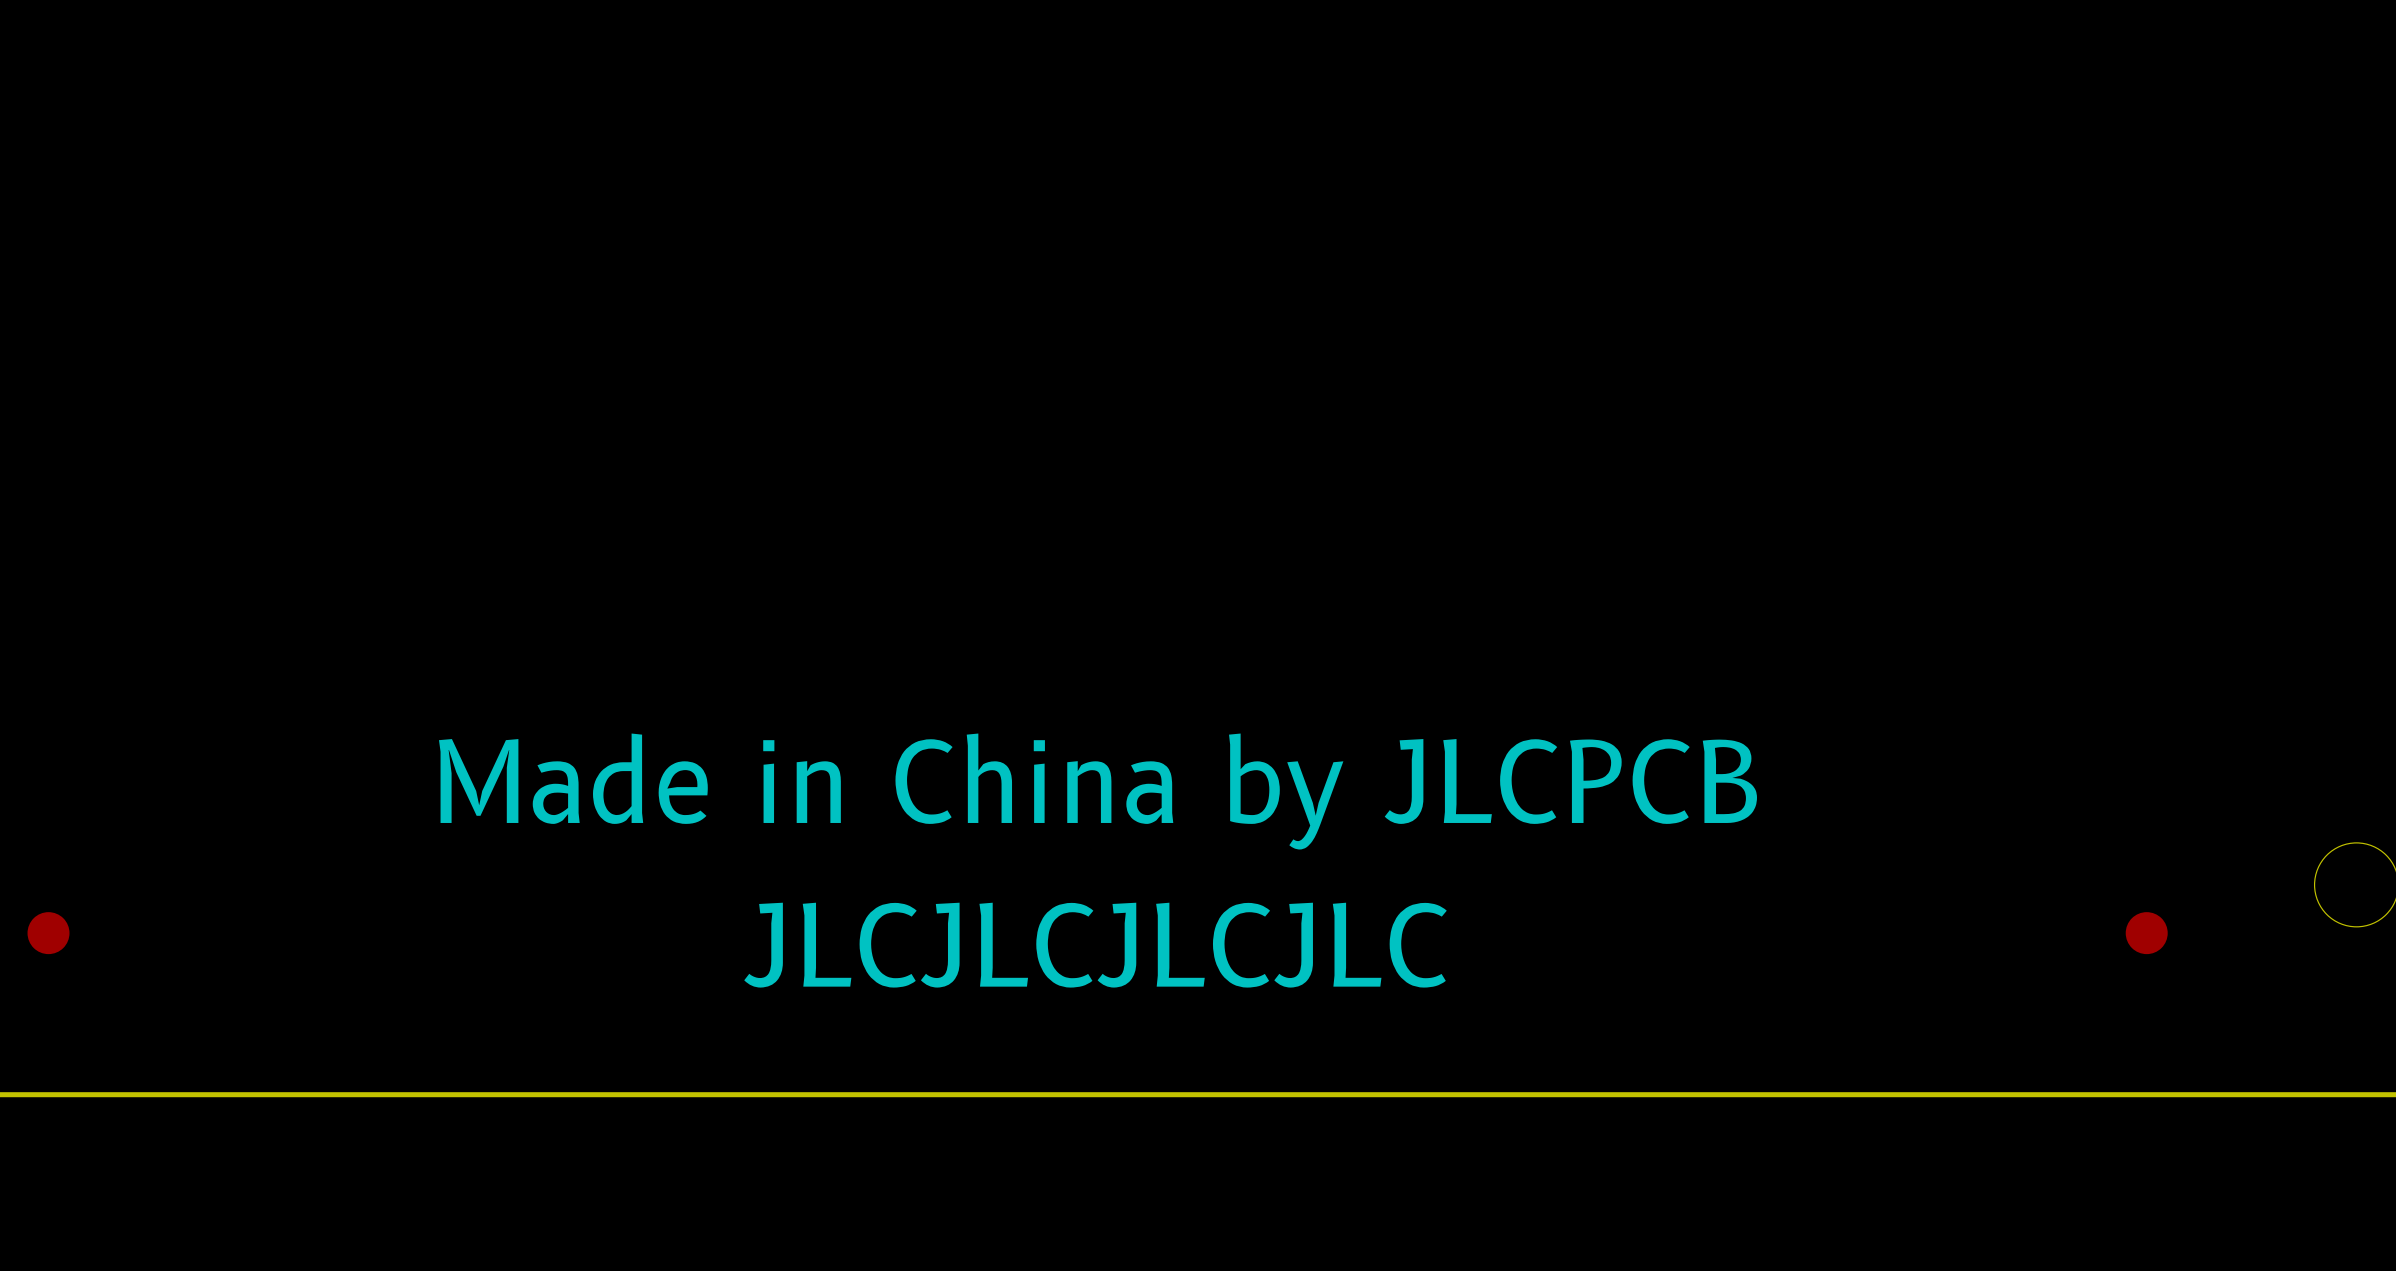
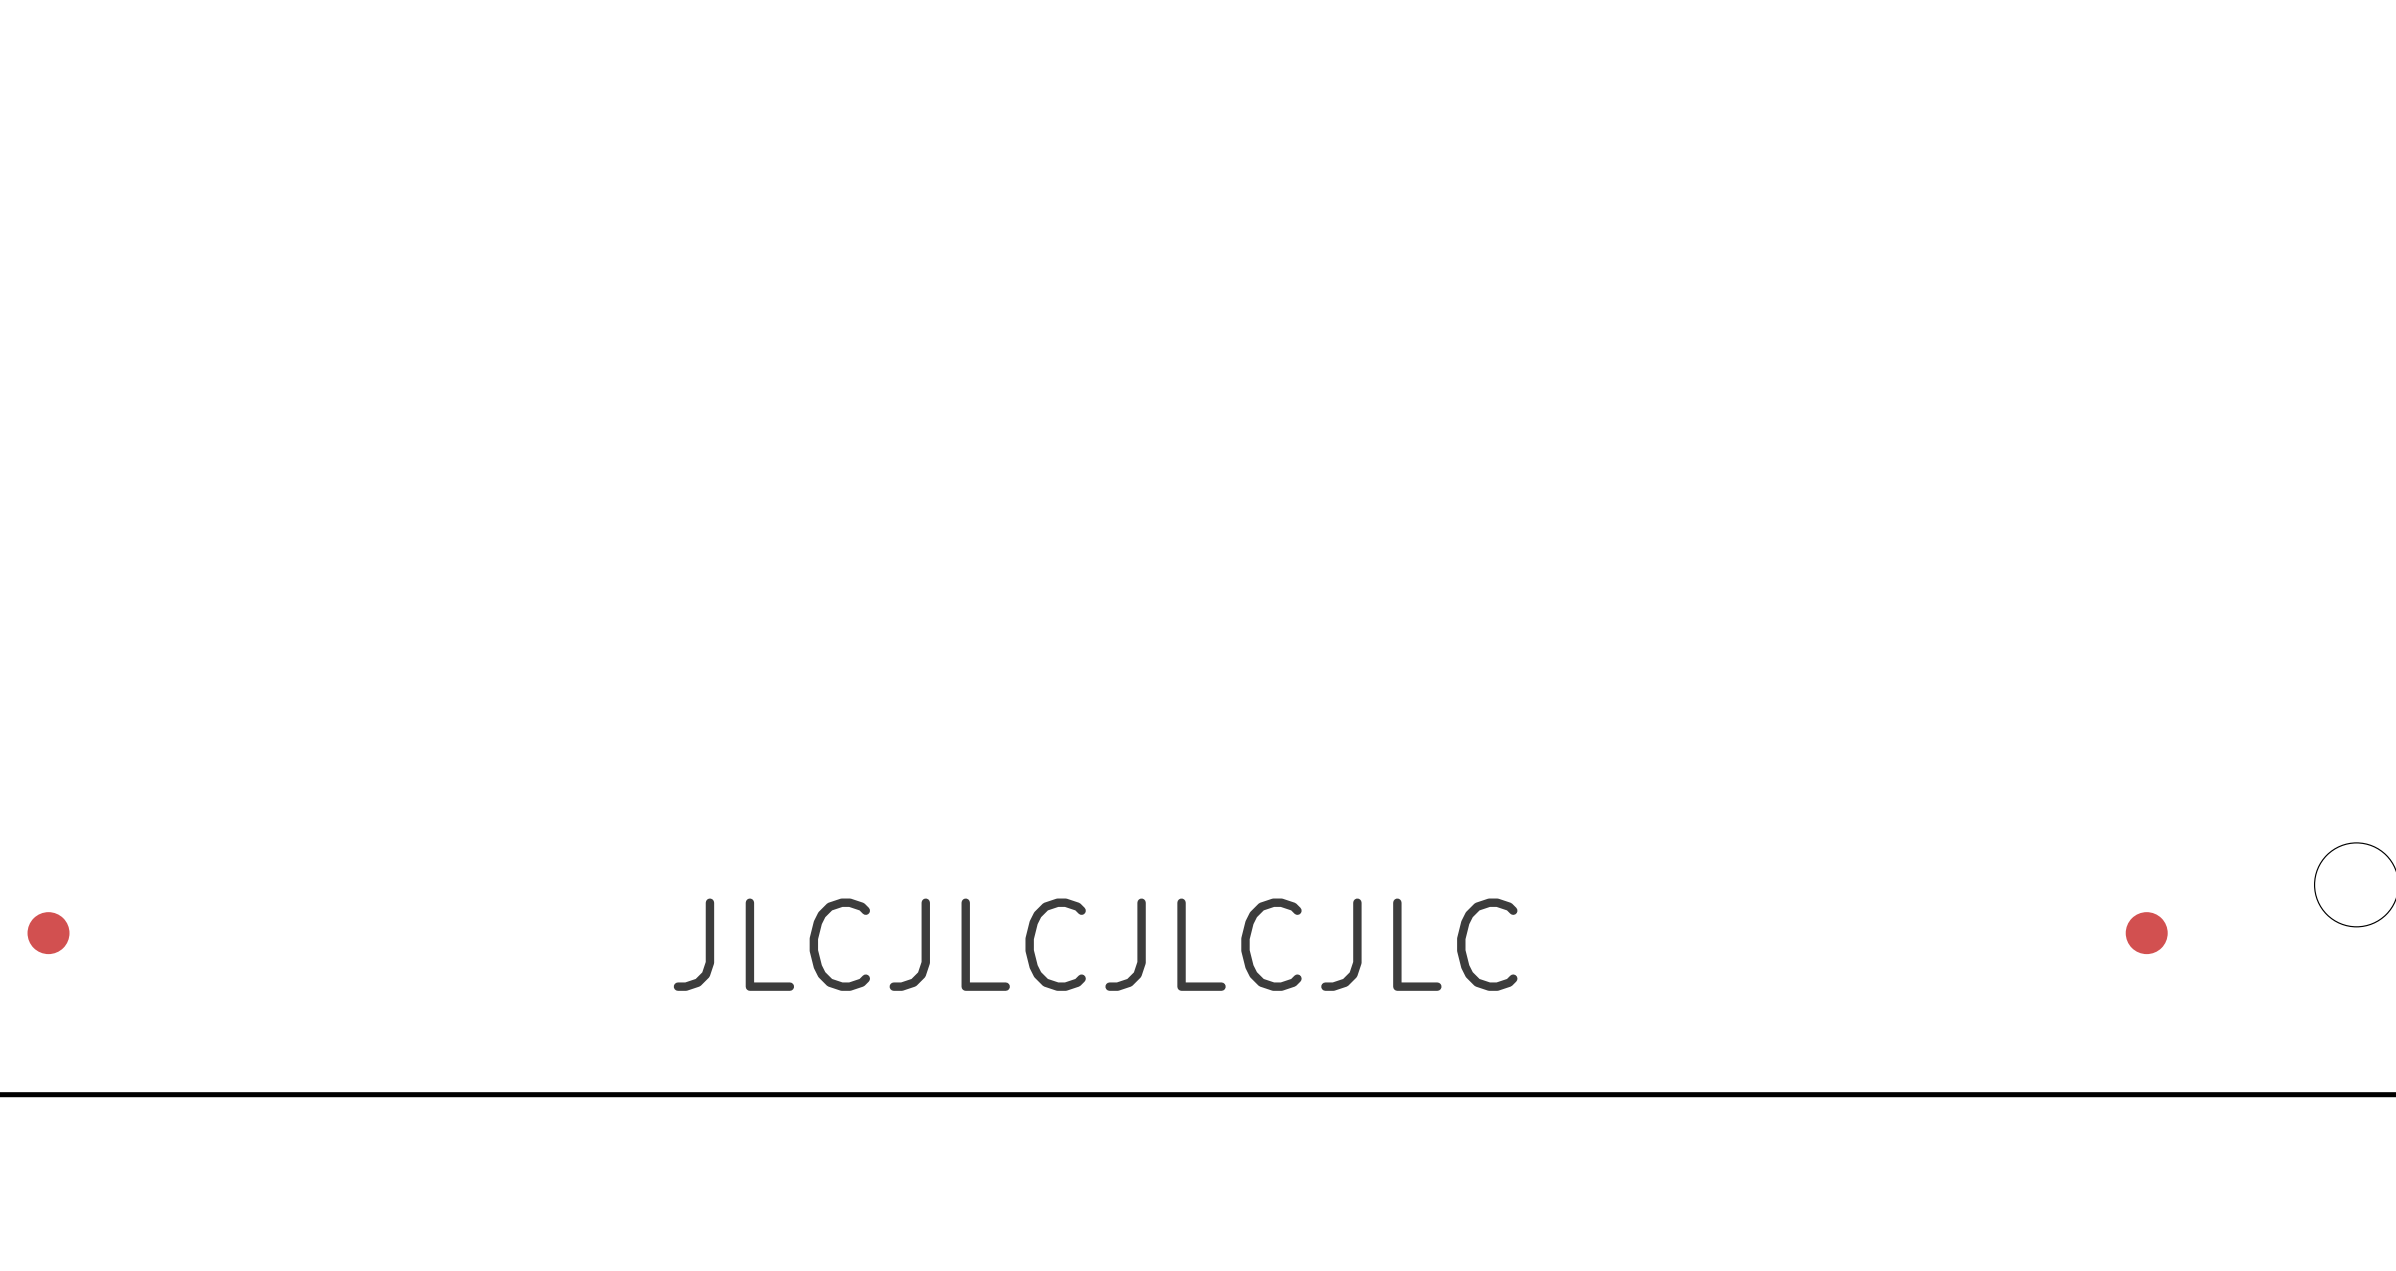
text: Made in China by JLCPCB (1097, 791) -> none

